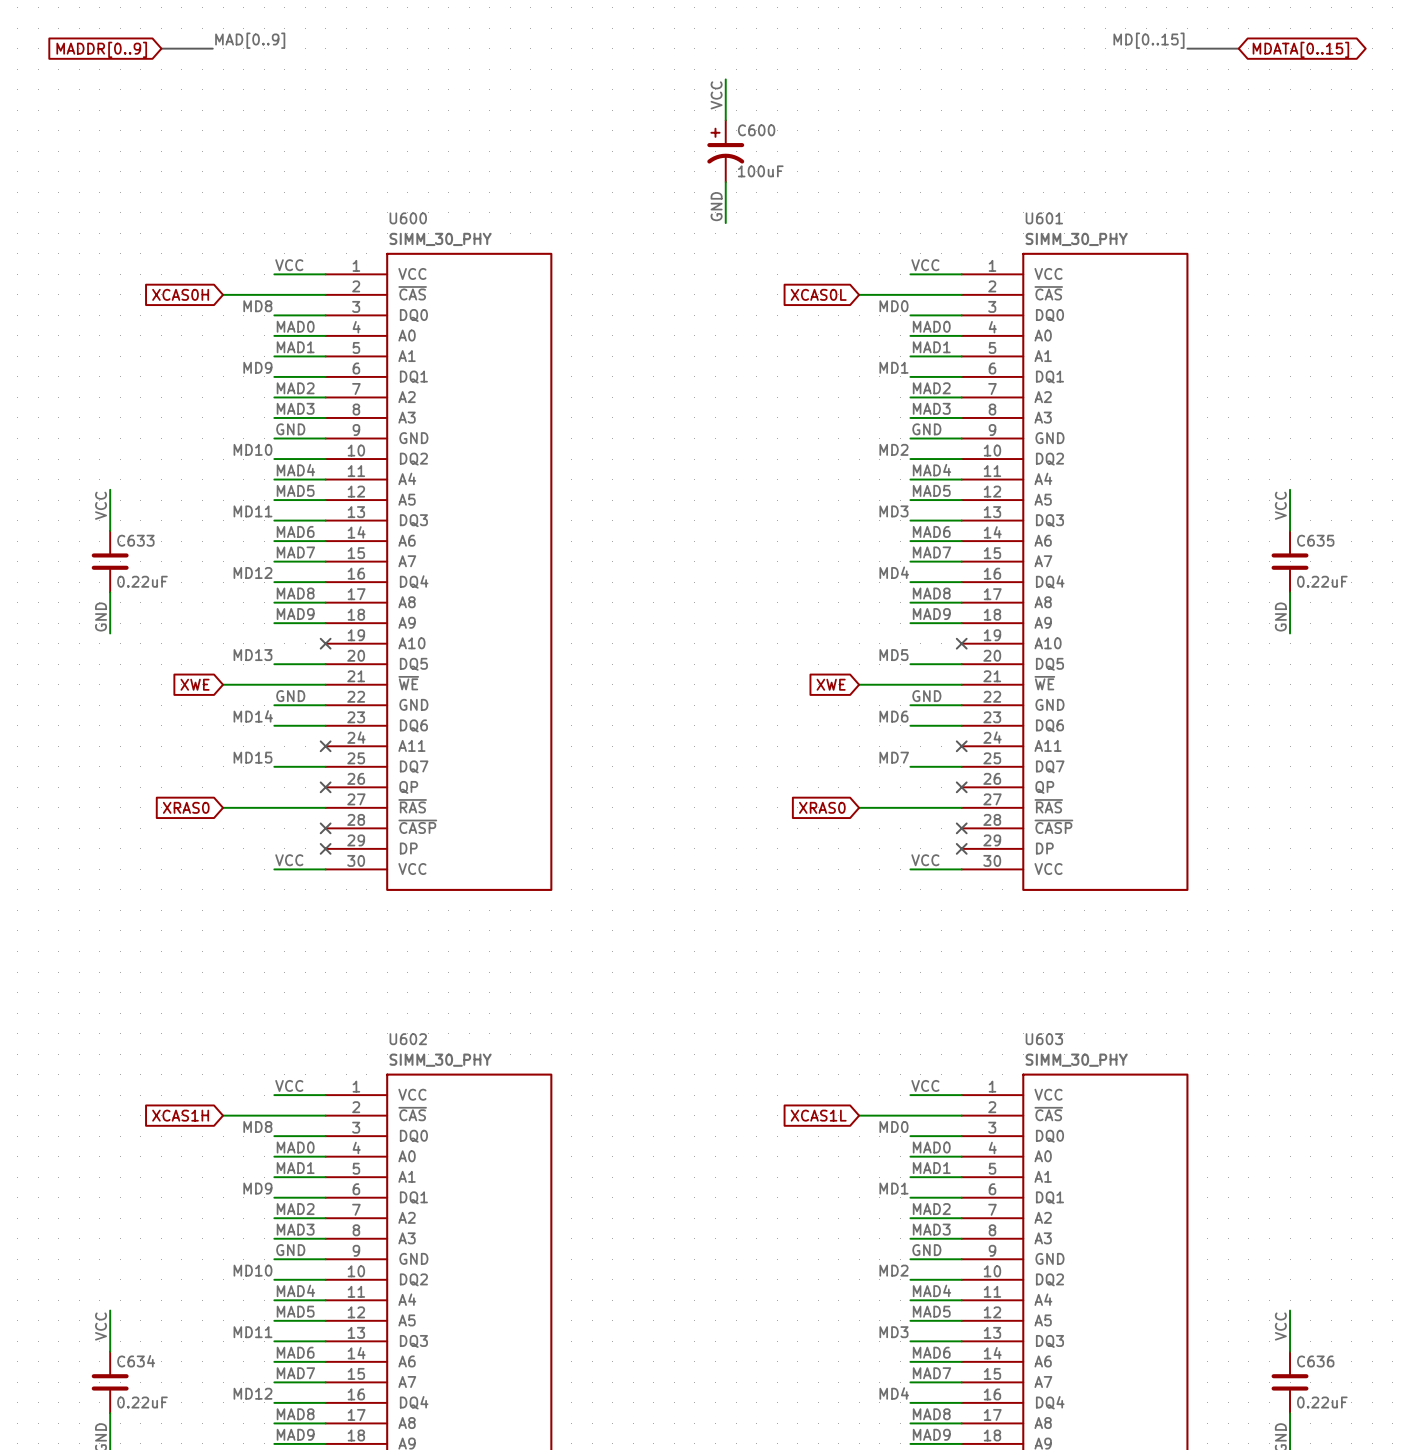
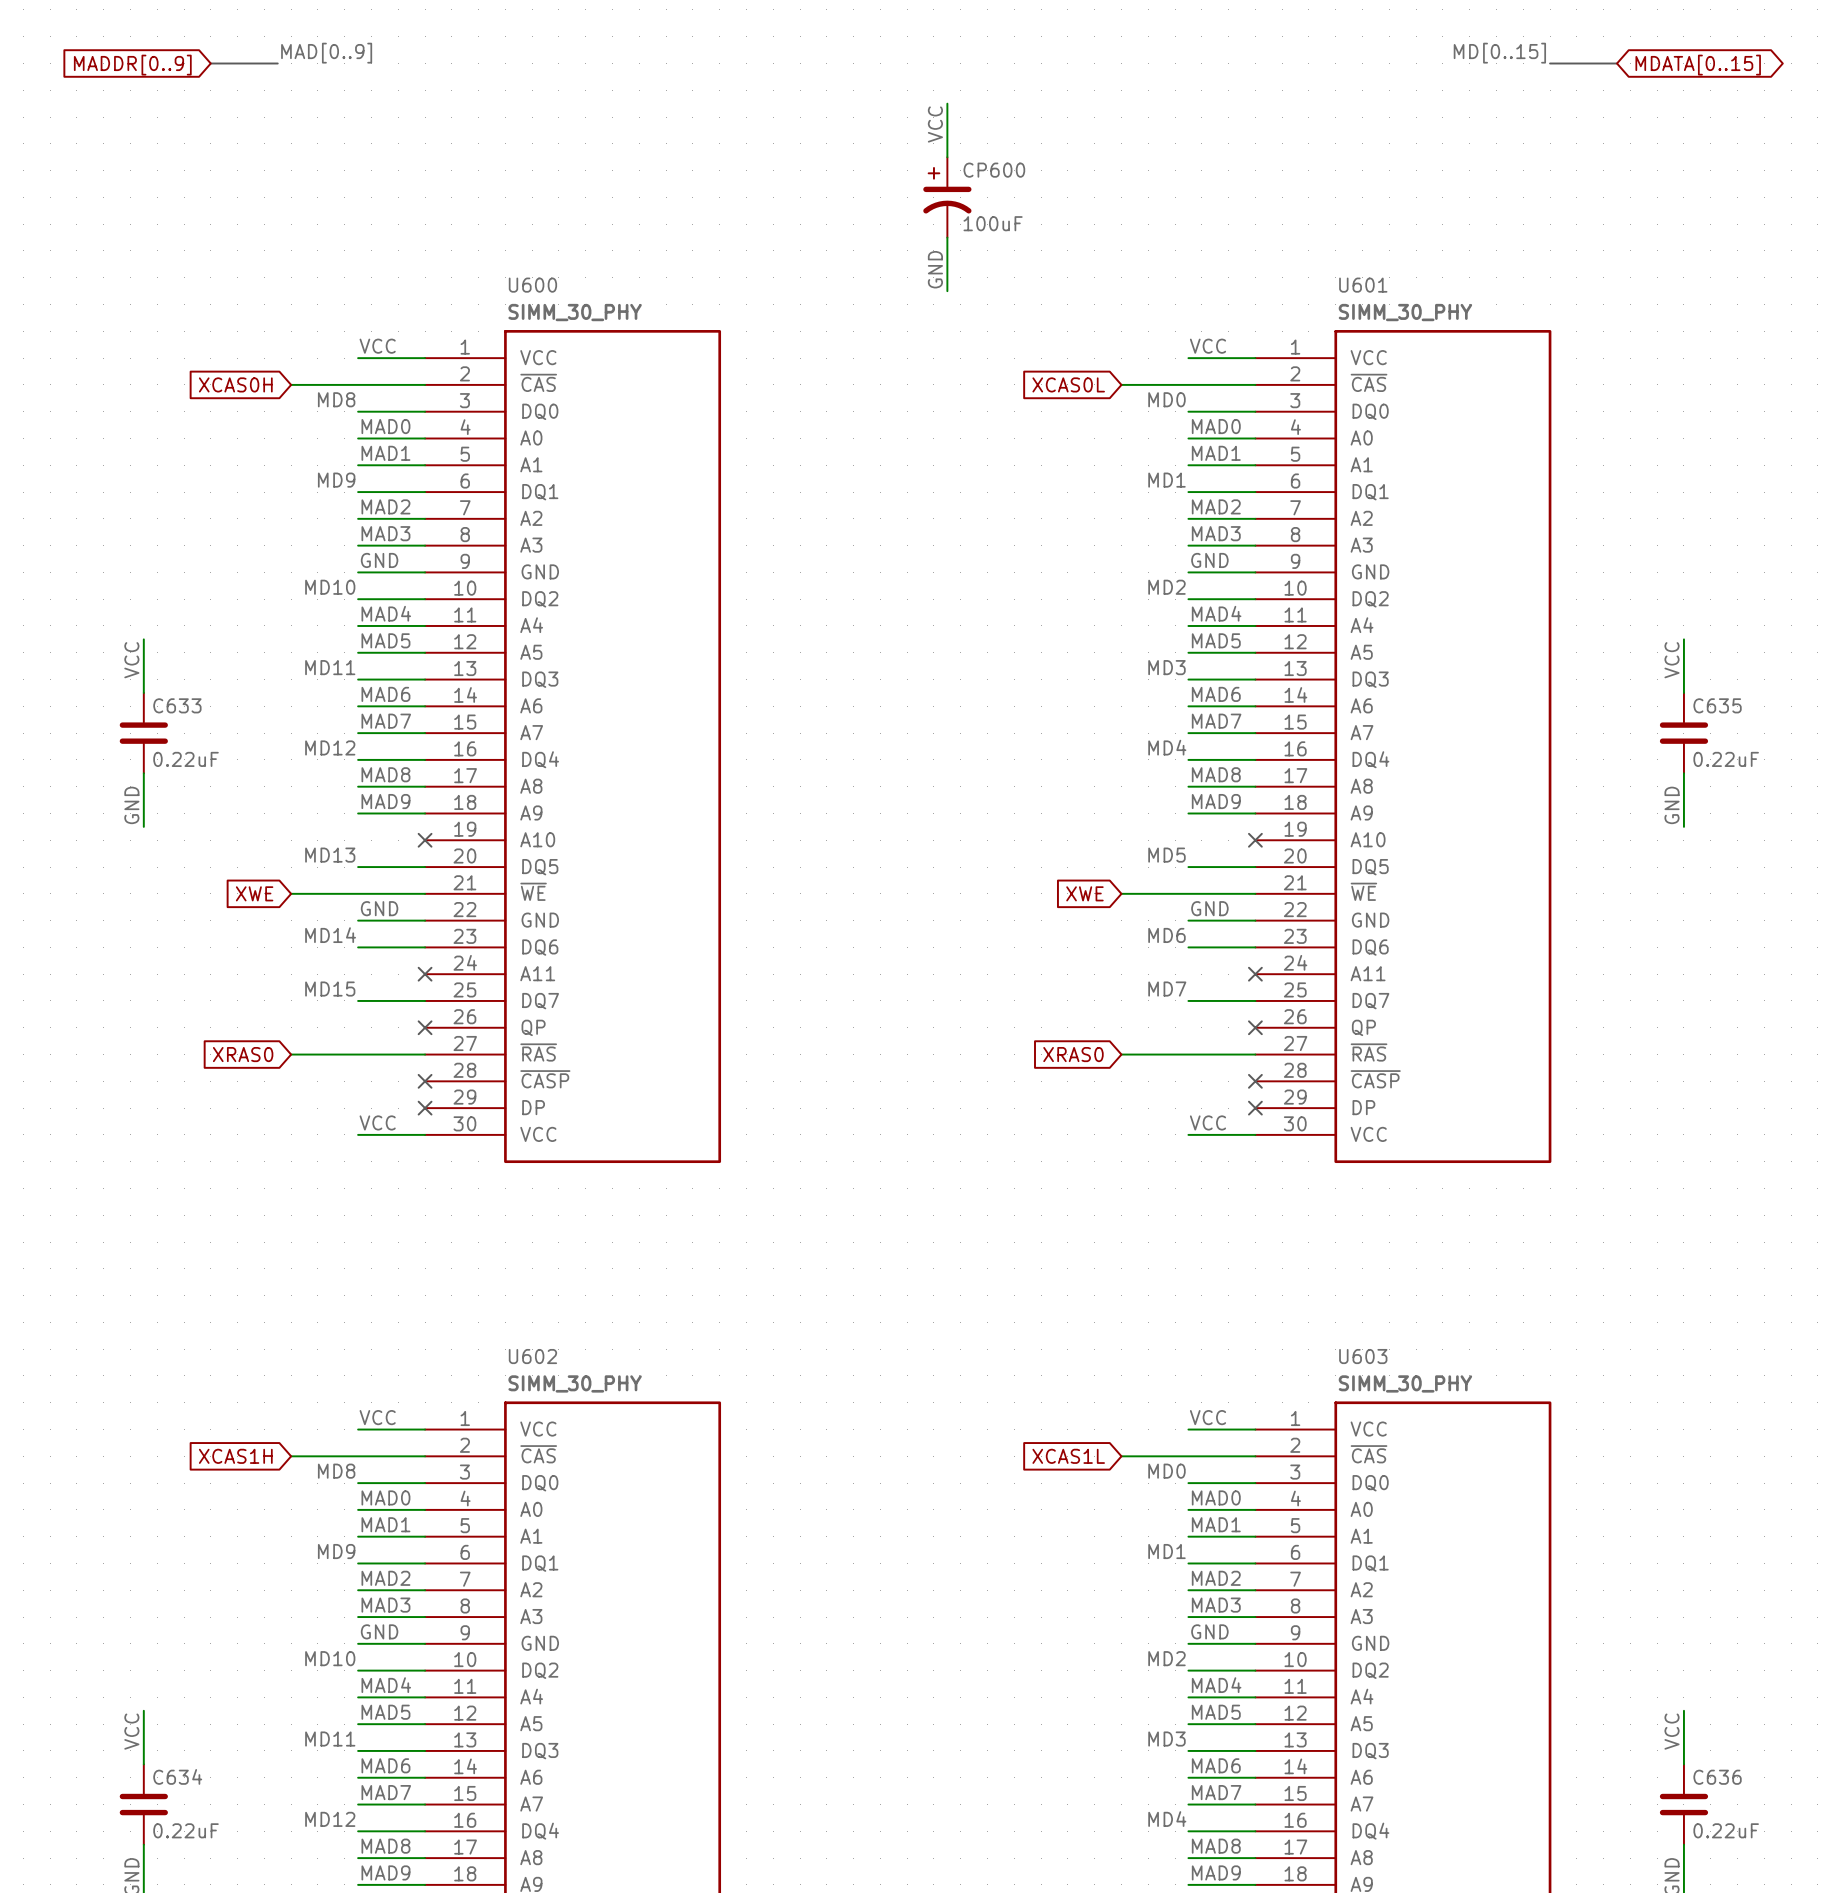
C600 name: C600 (756, 130) -> CP600 (994, 170)

